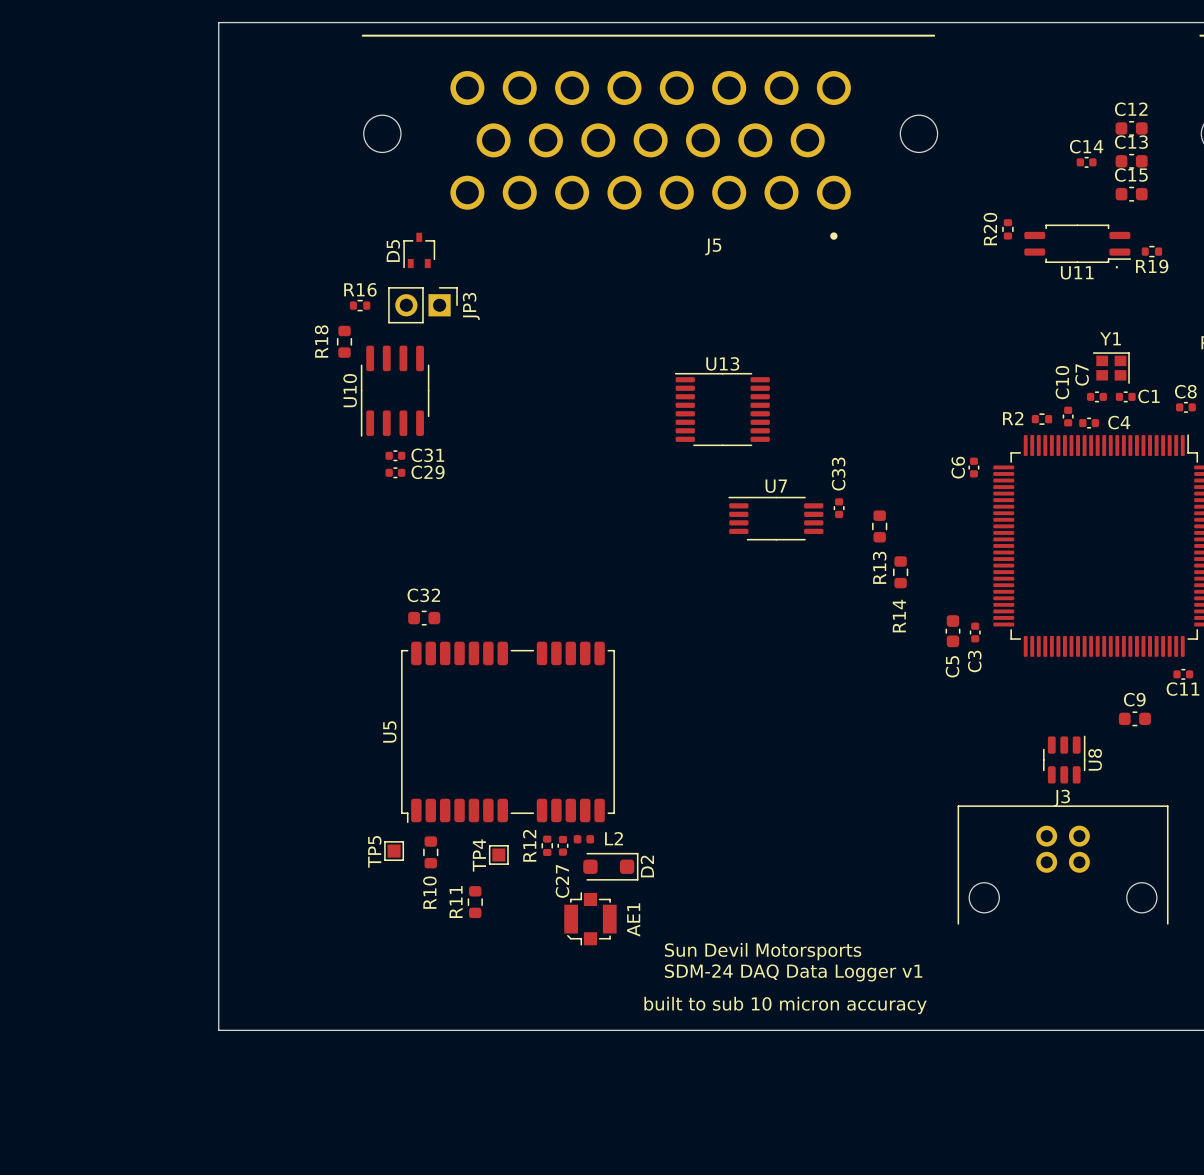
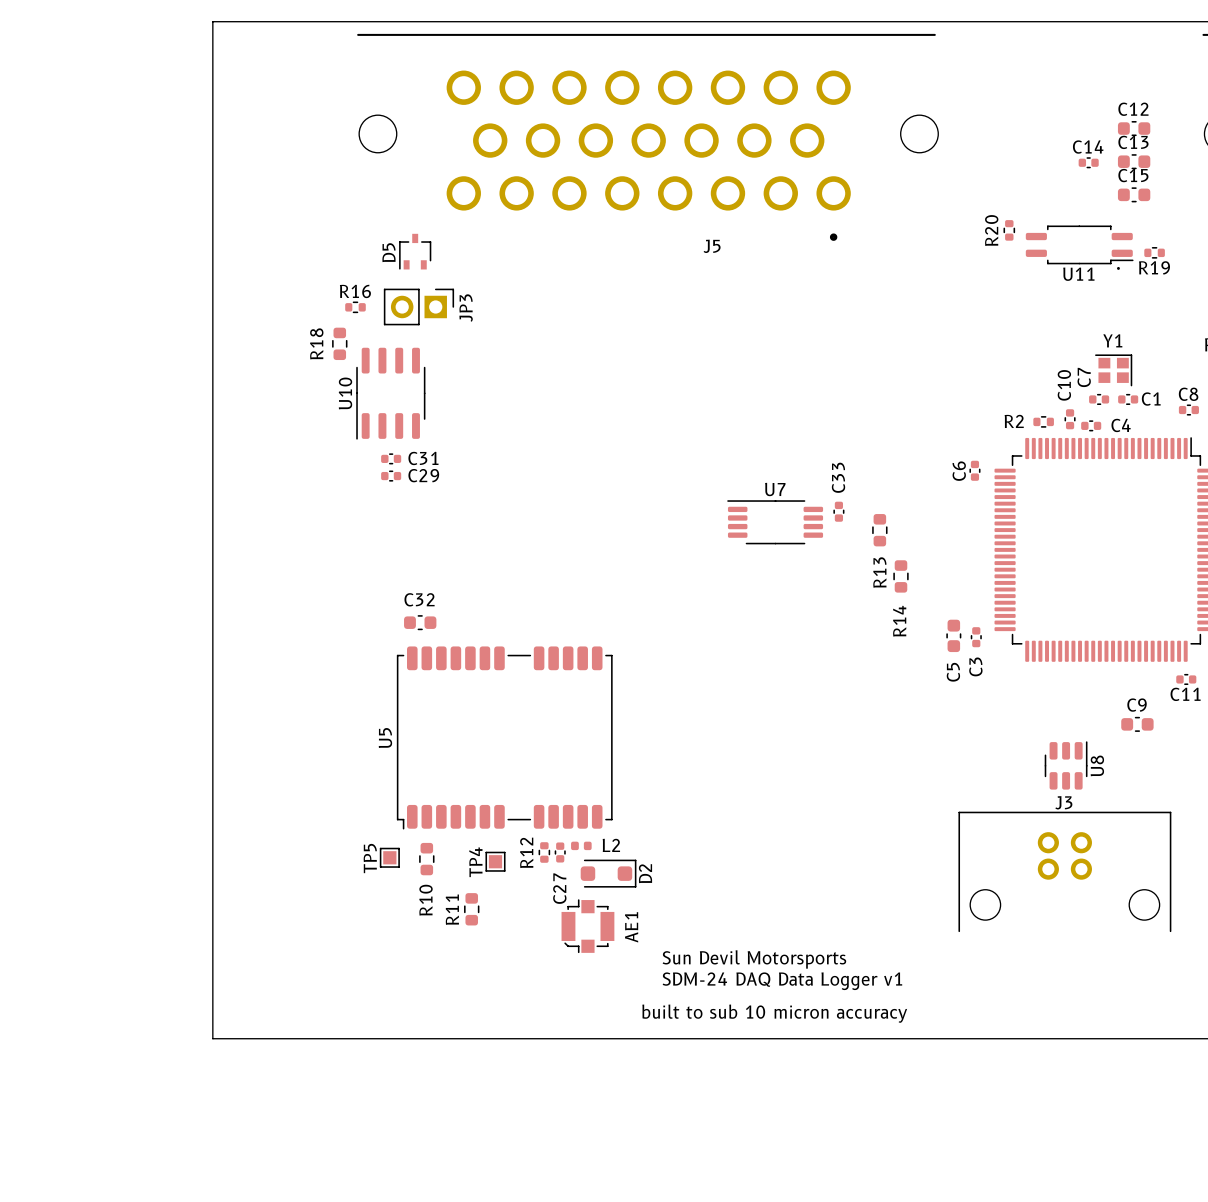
U13: (722, 409) -> none

